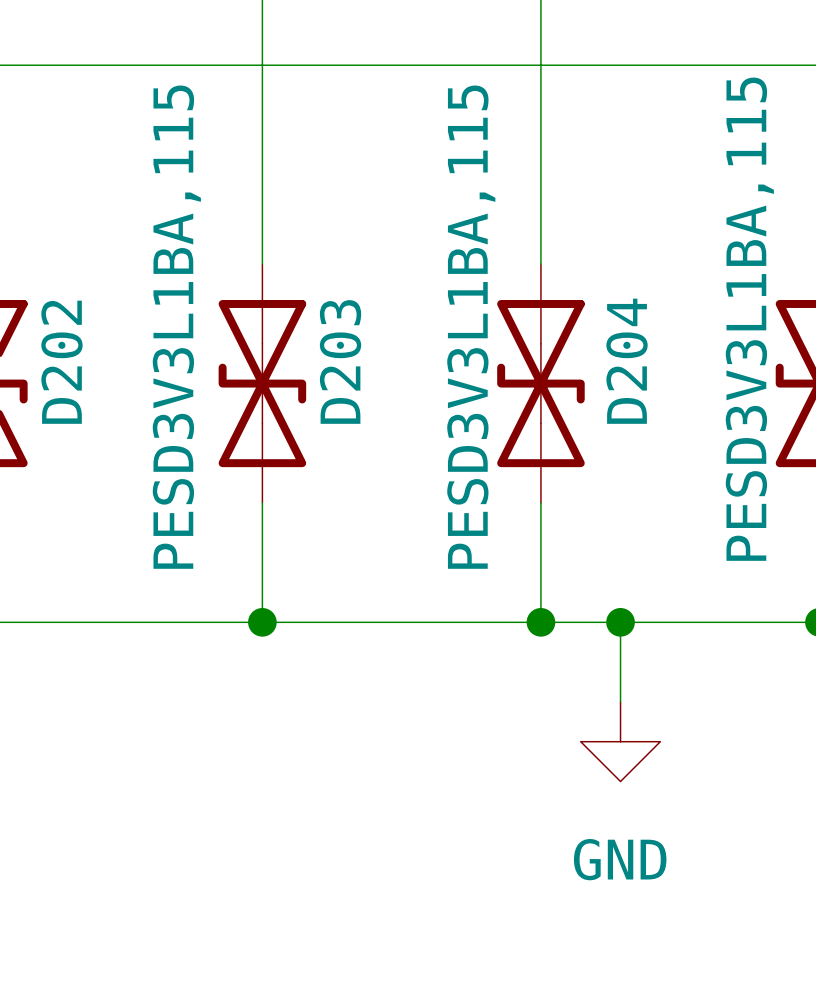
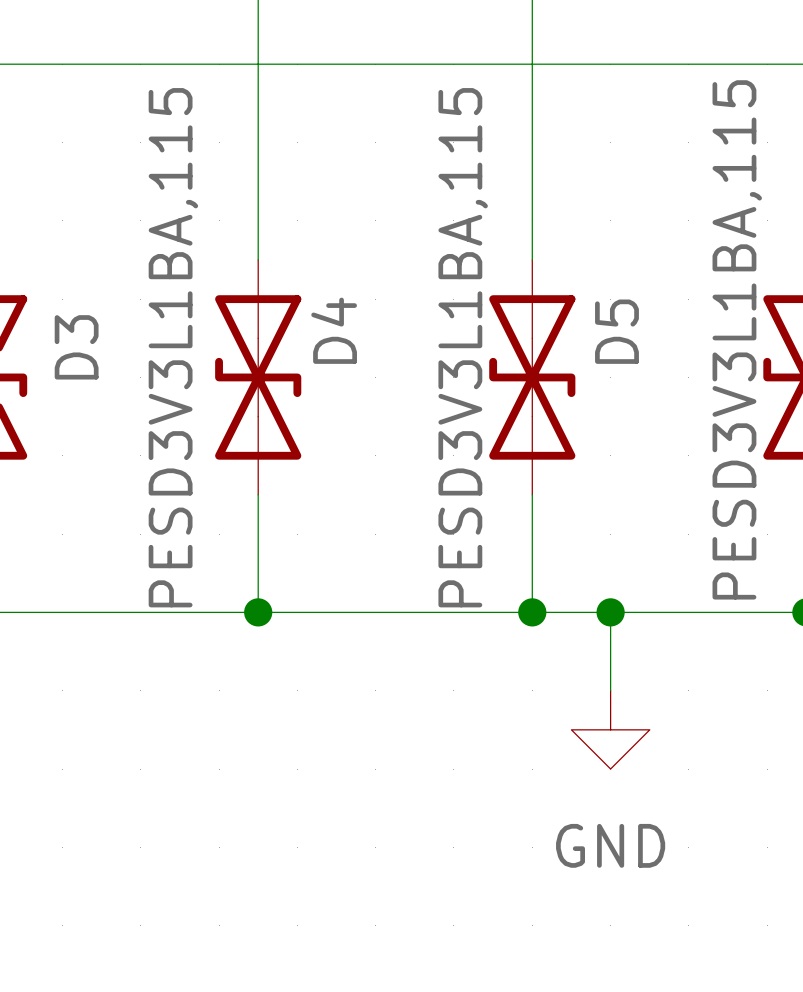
D203 name: D203 (340, 361) -> D4 (334, 330)
D204 name: D204 (627, 361) -> D5 (616, 331)
D202 name: D202 (61, 362) -> D3 (76, 347)

